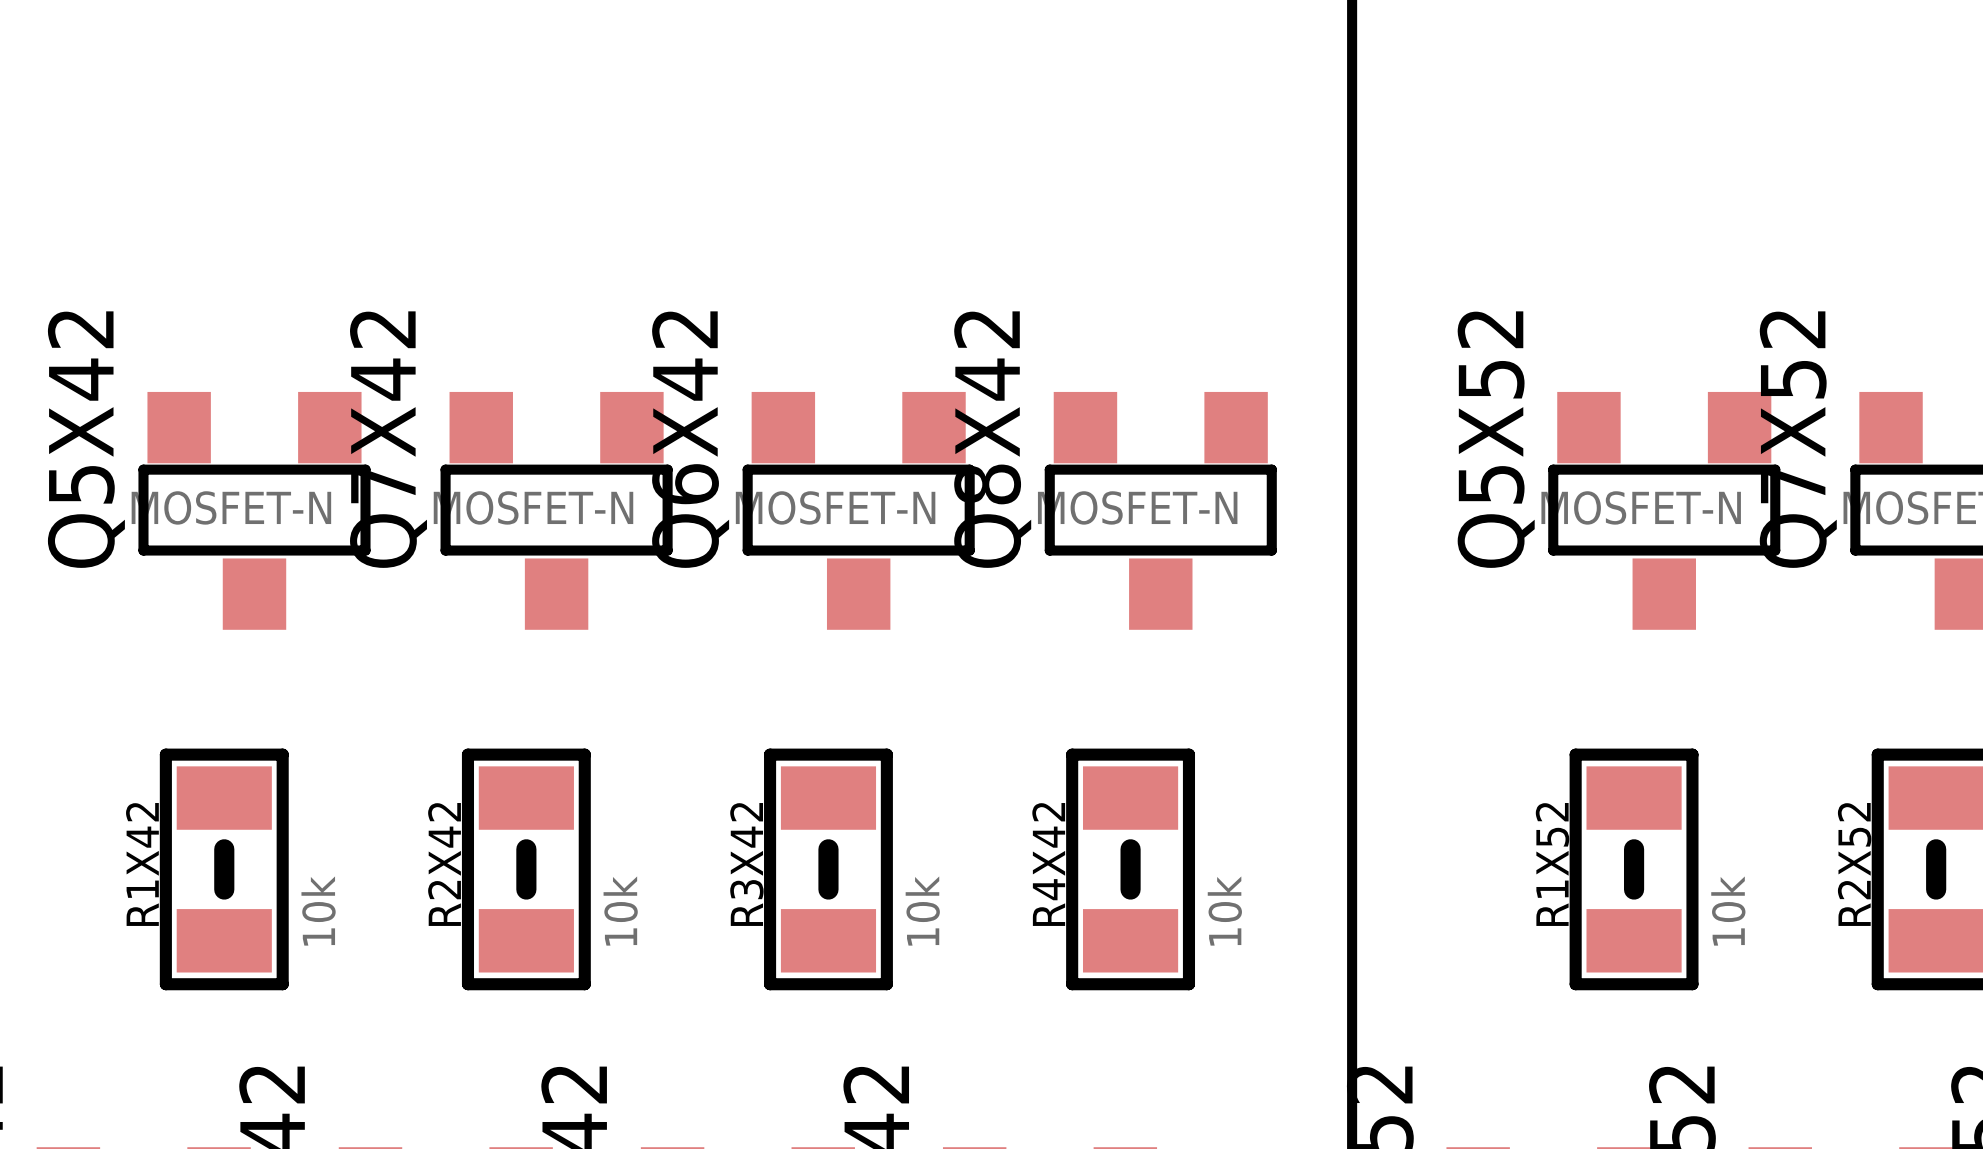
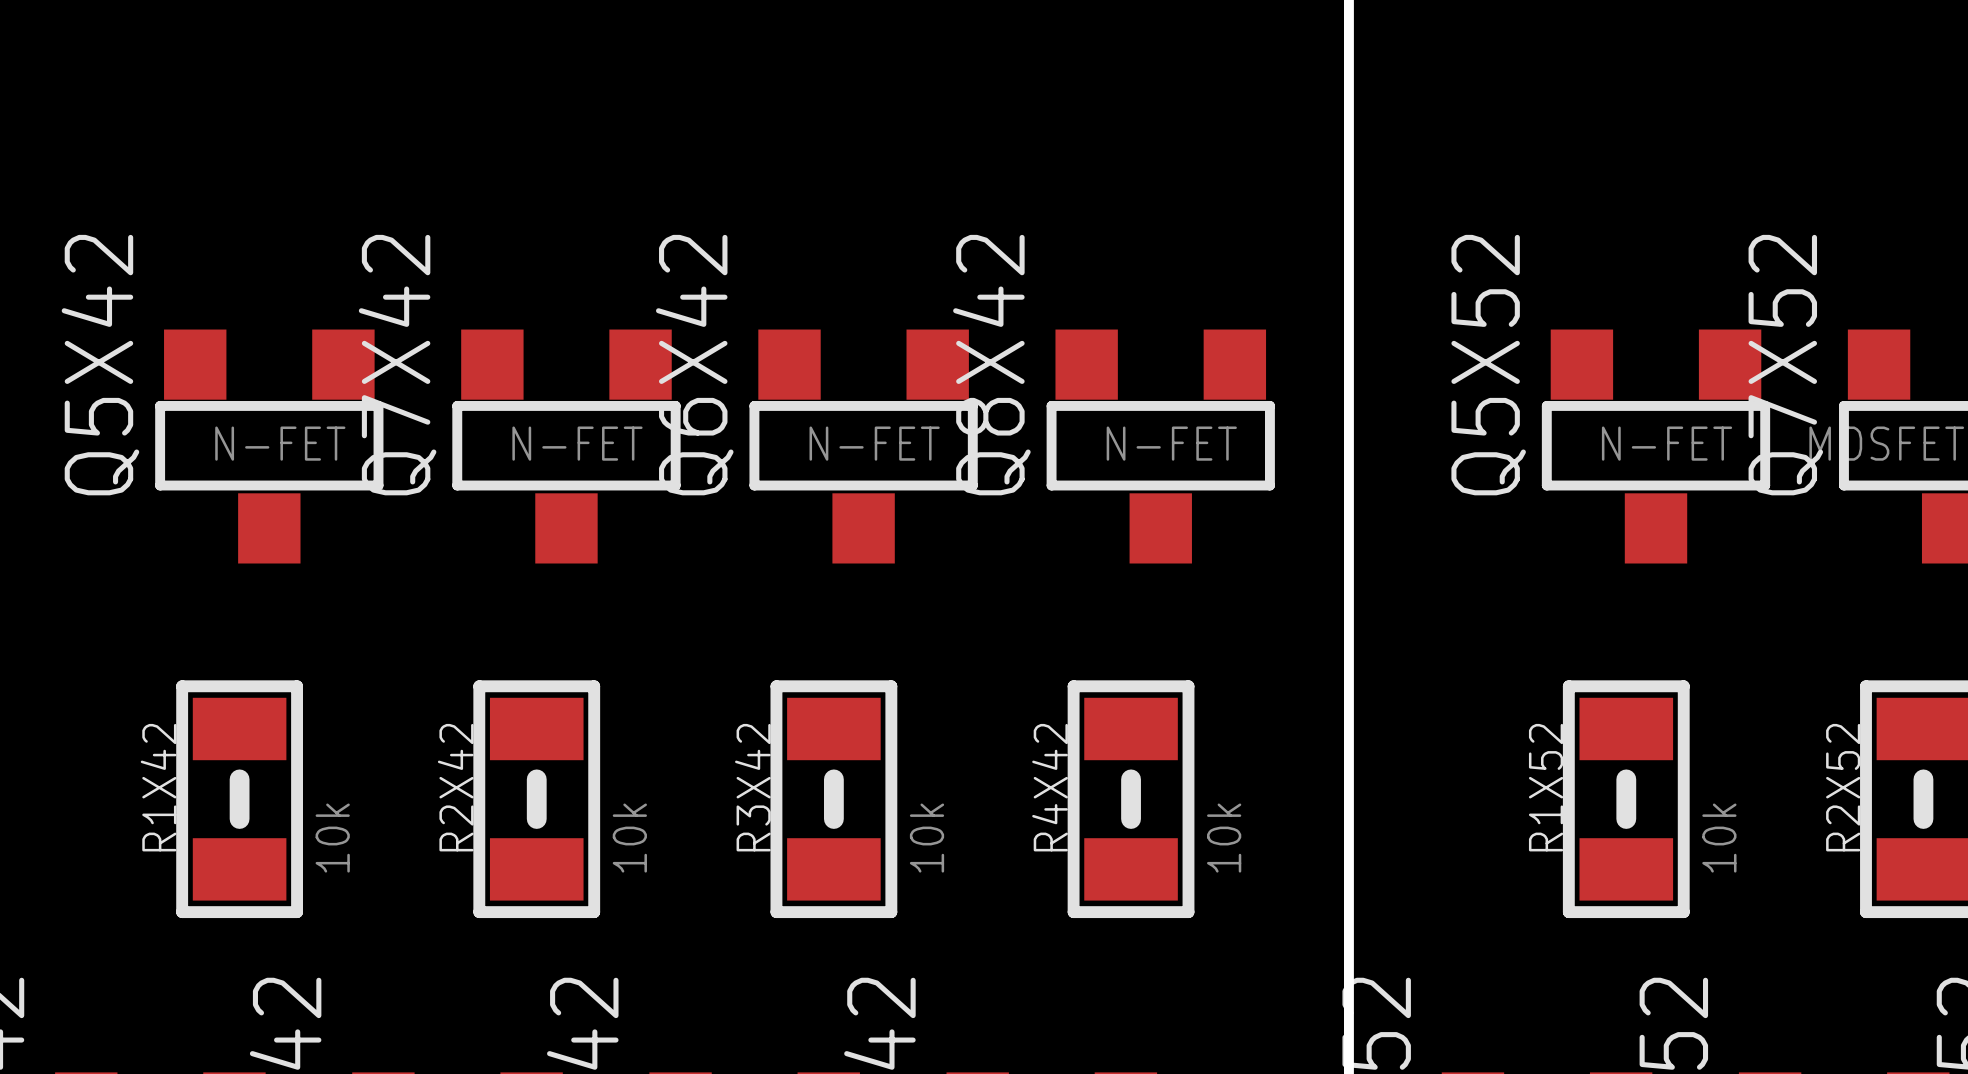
Q5X42 value: MOSFET-N (231, 507) -> N-FET (280, 443)
Q7X42 value: MOSFET-N (533, 507) -> N-FET (577, 443)
Q6X42 value: MOSFET-N (835, 507) -> N-FET (874, 443)
Q8X42 value: MOSFET-N (1137, 507) -> N-FET (1171, 443)
Q5X52 value: MOSFET-N (1641, 507) -> N-FET (1667, 443)

